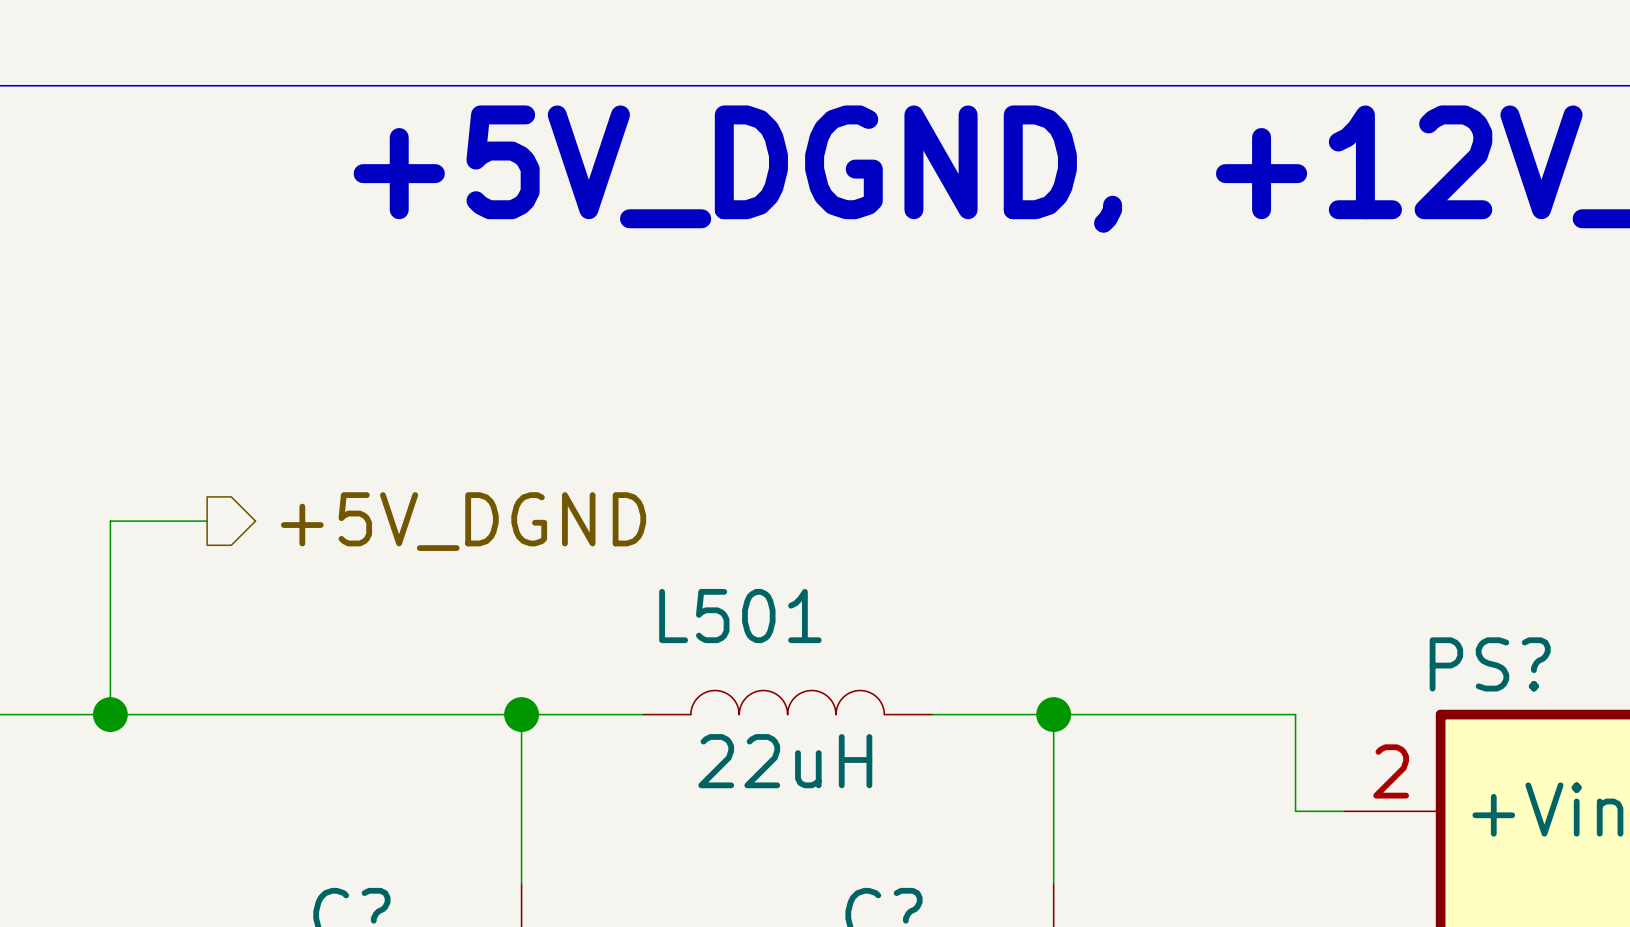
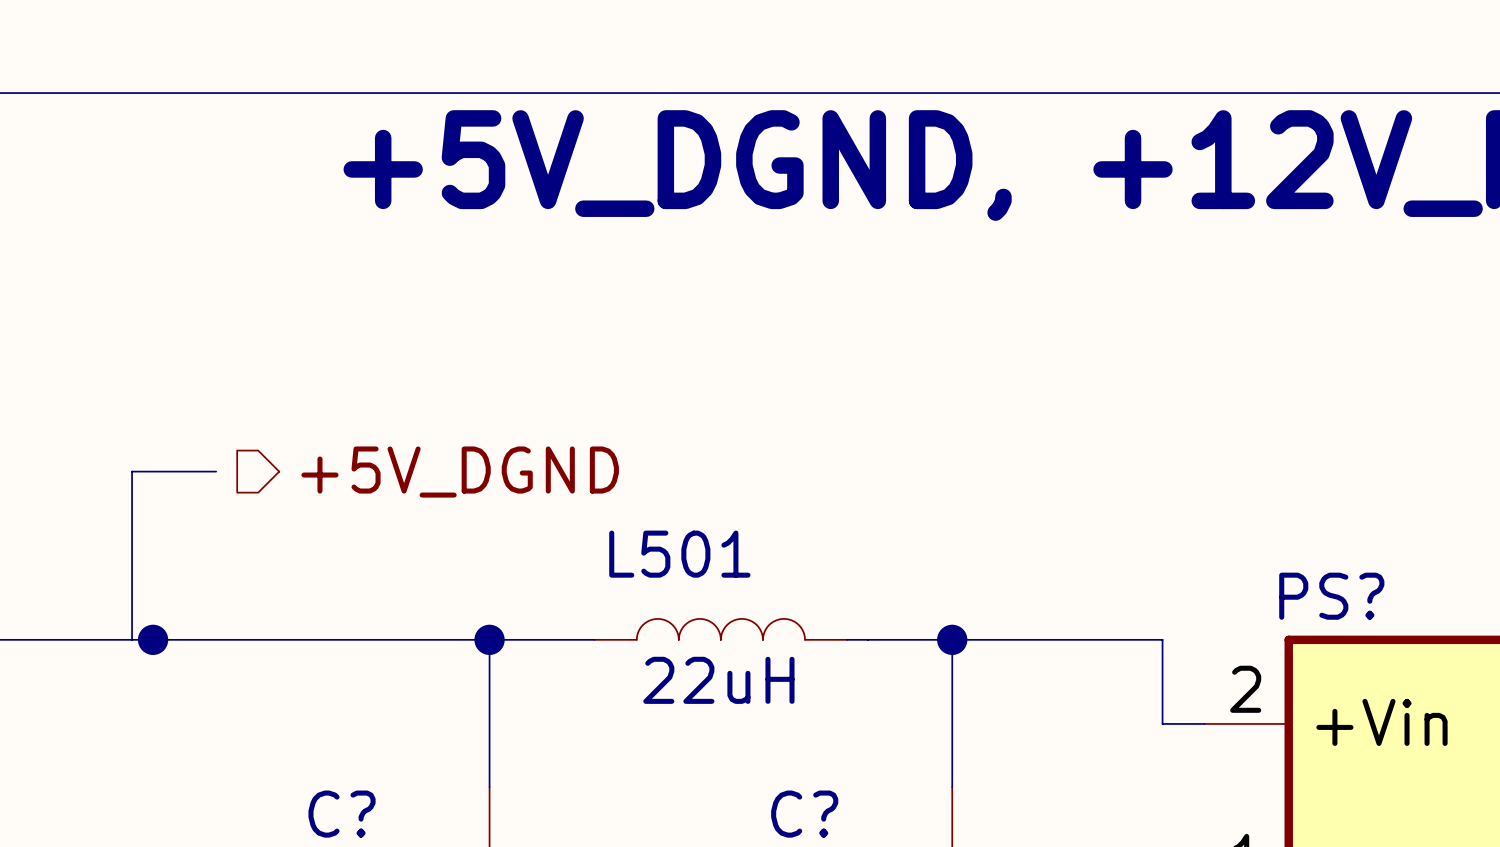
hierarchical label position: +5V_DGND (463, 521) -> +5V_DGND (460, 472)
junction position: (110, 714) -> (153, 639)

